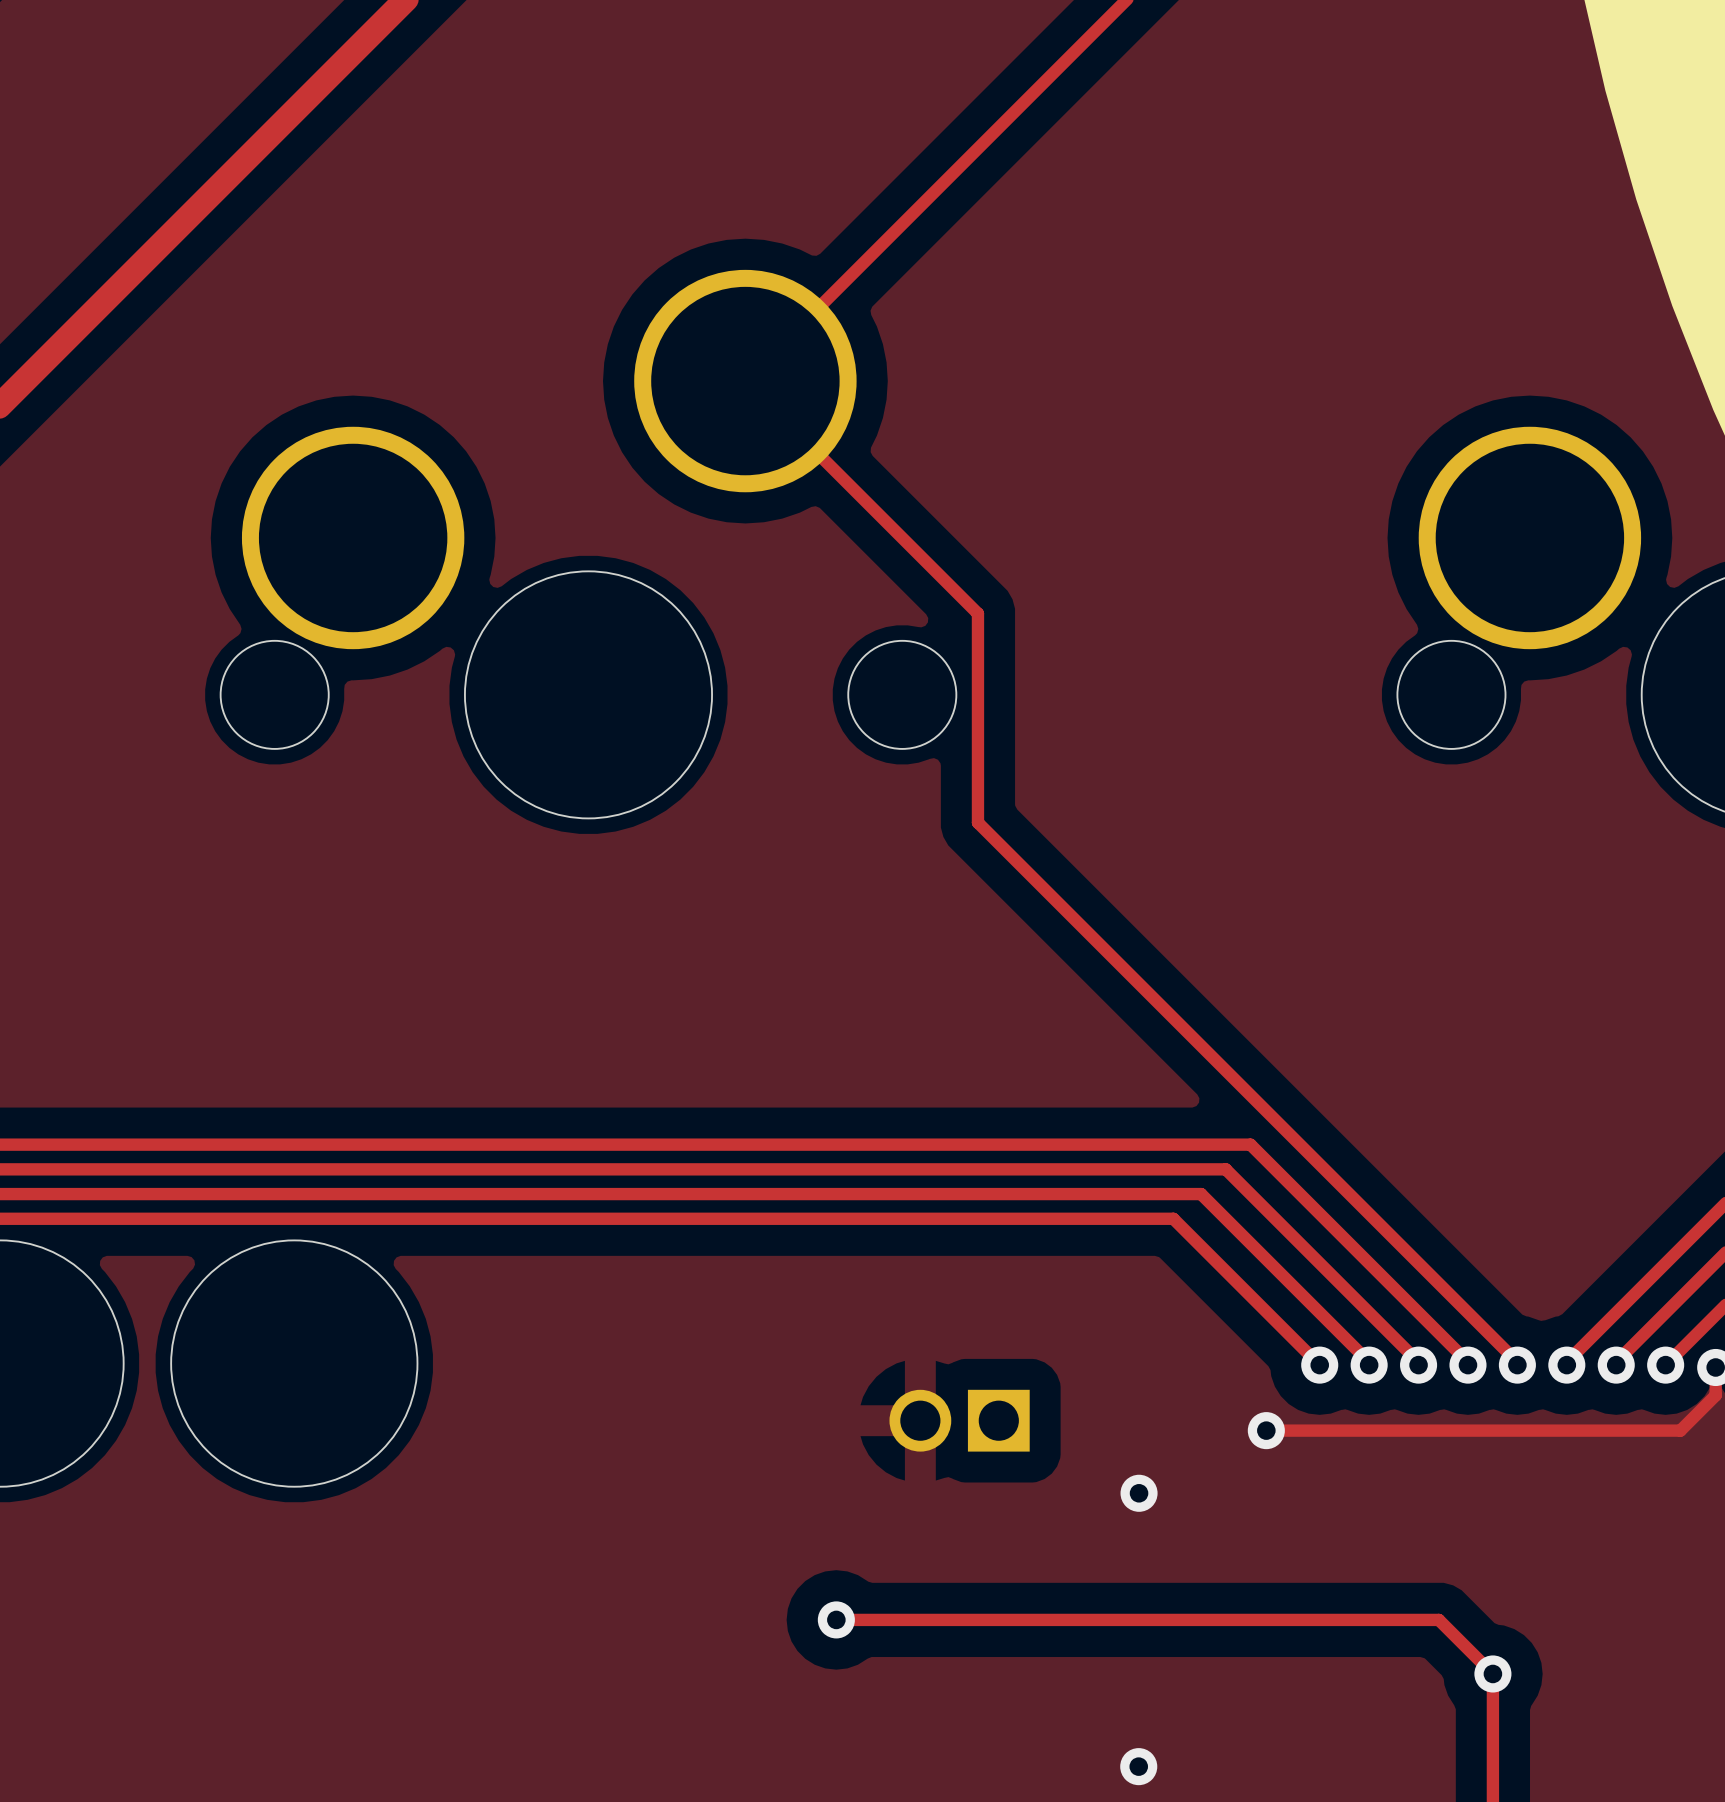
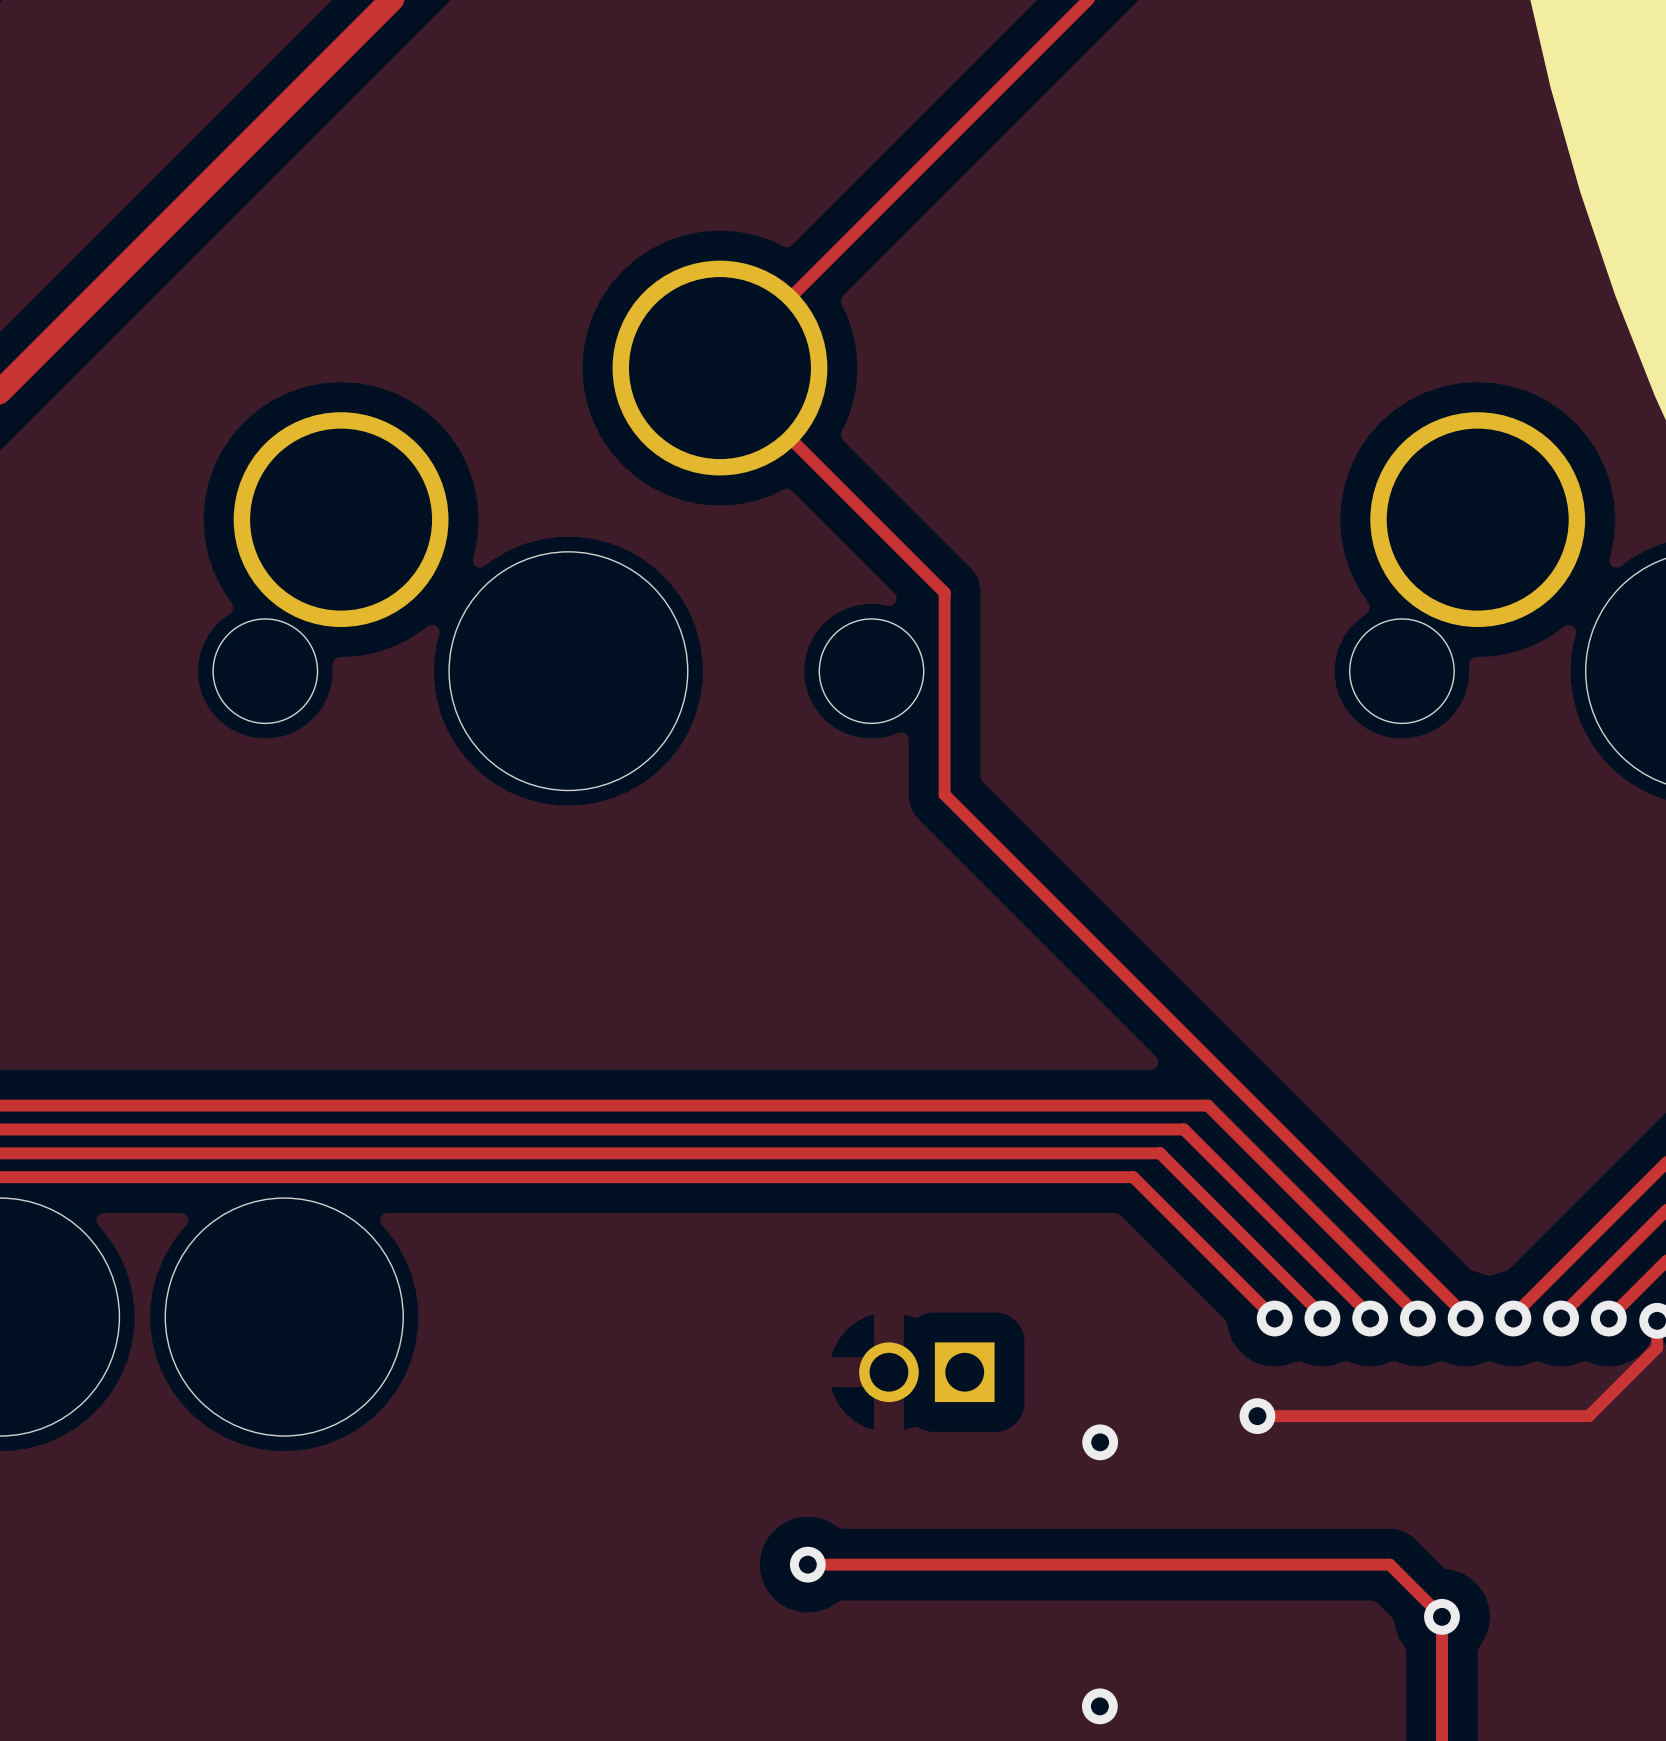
track: (1266, 1430) (1680, 1430) -> (1257, 1416) (1588, 1416) (1623, 1381)
via position: (1266, 1430) -> (1257, 1416)

